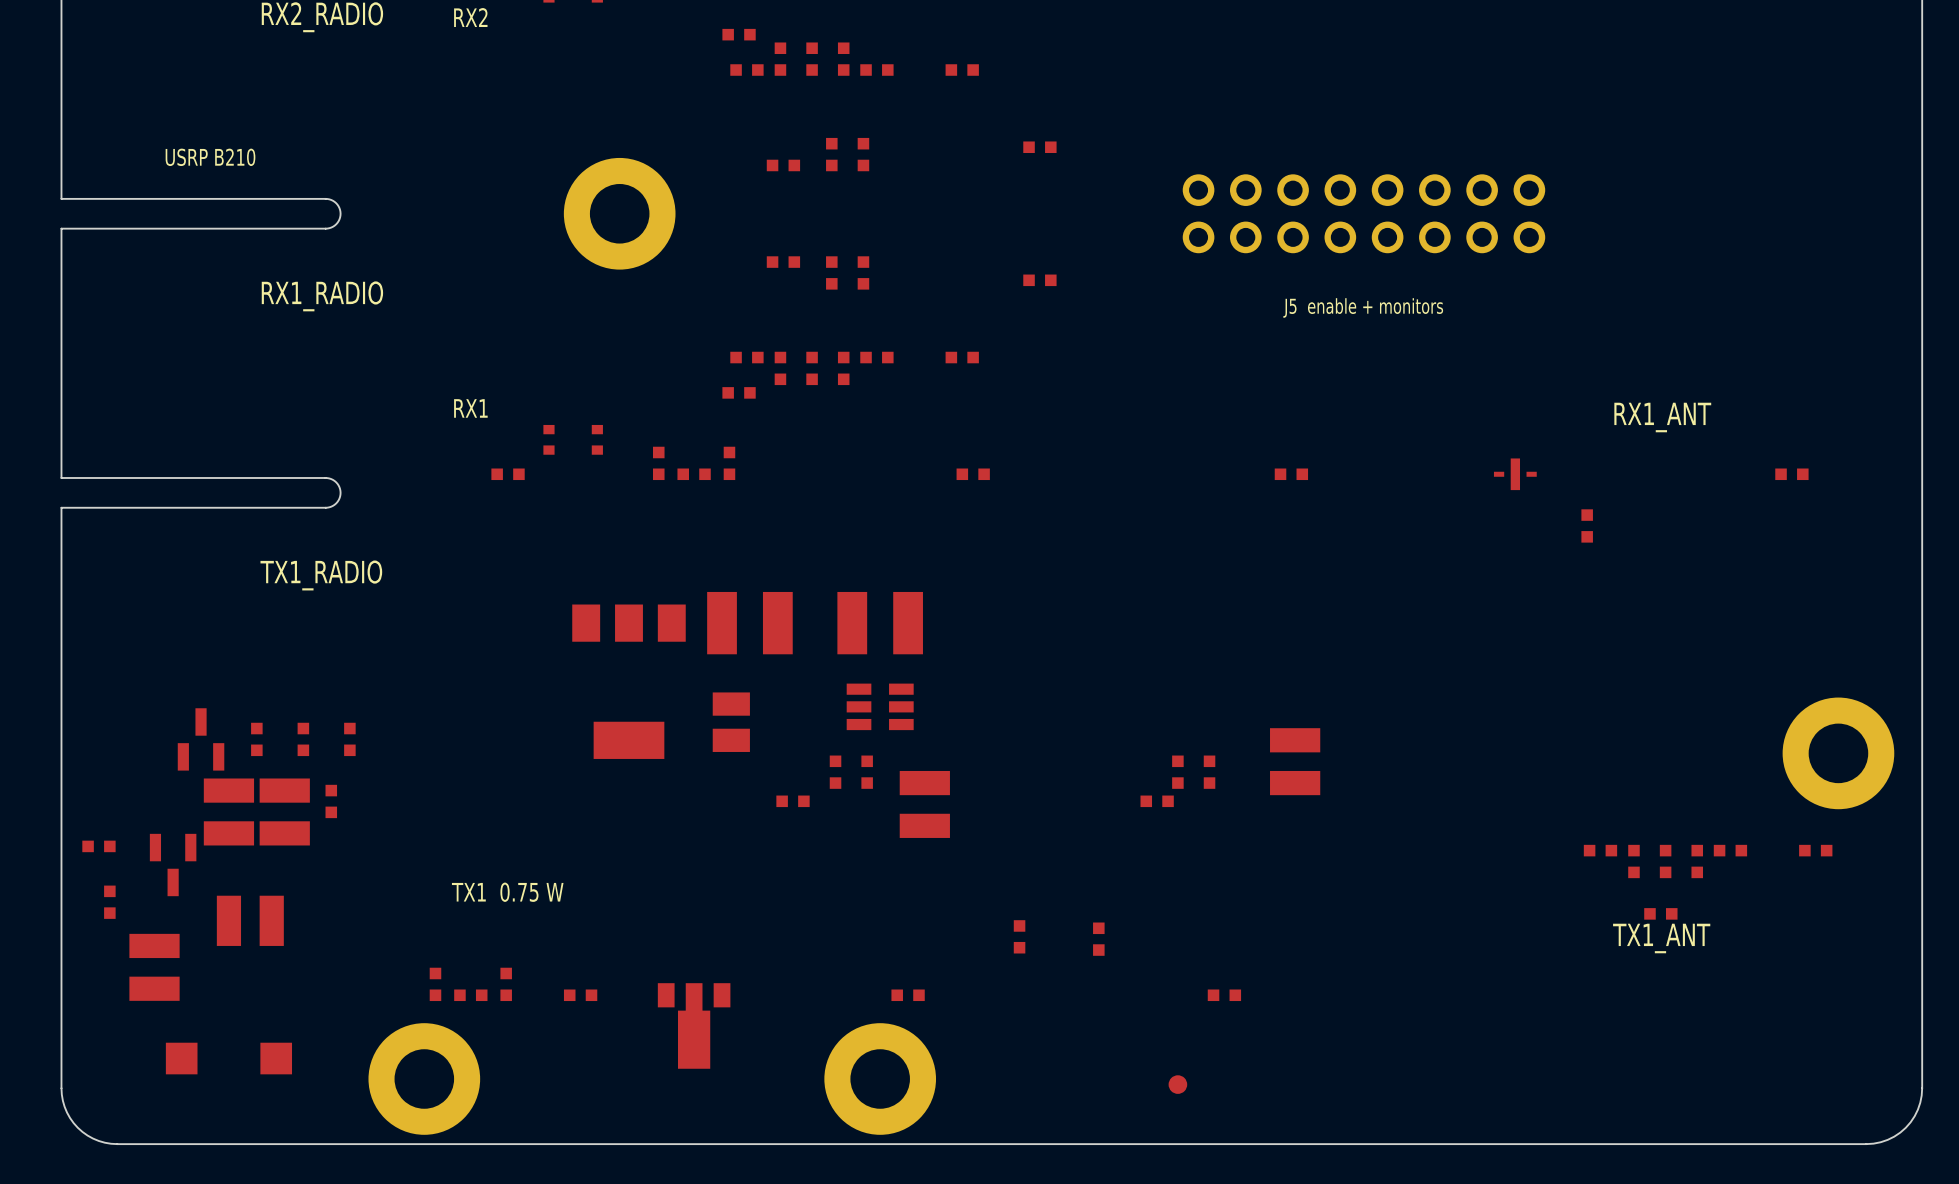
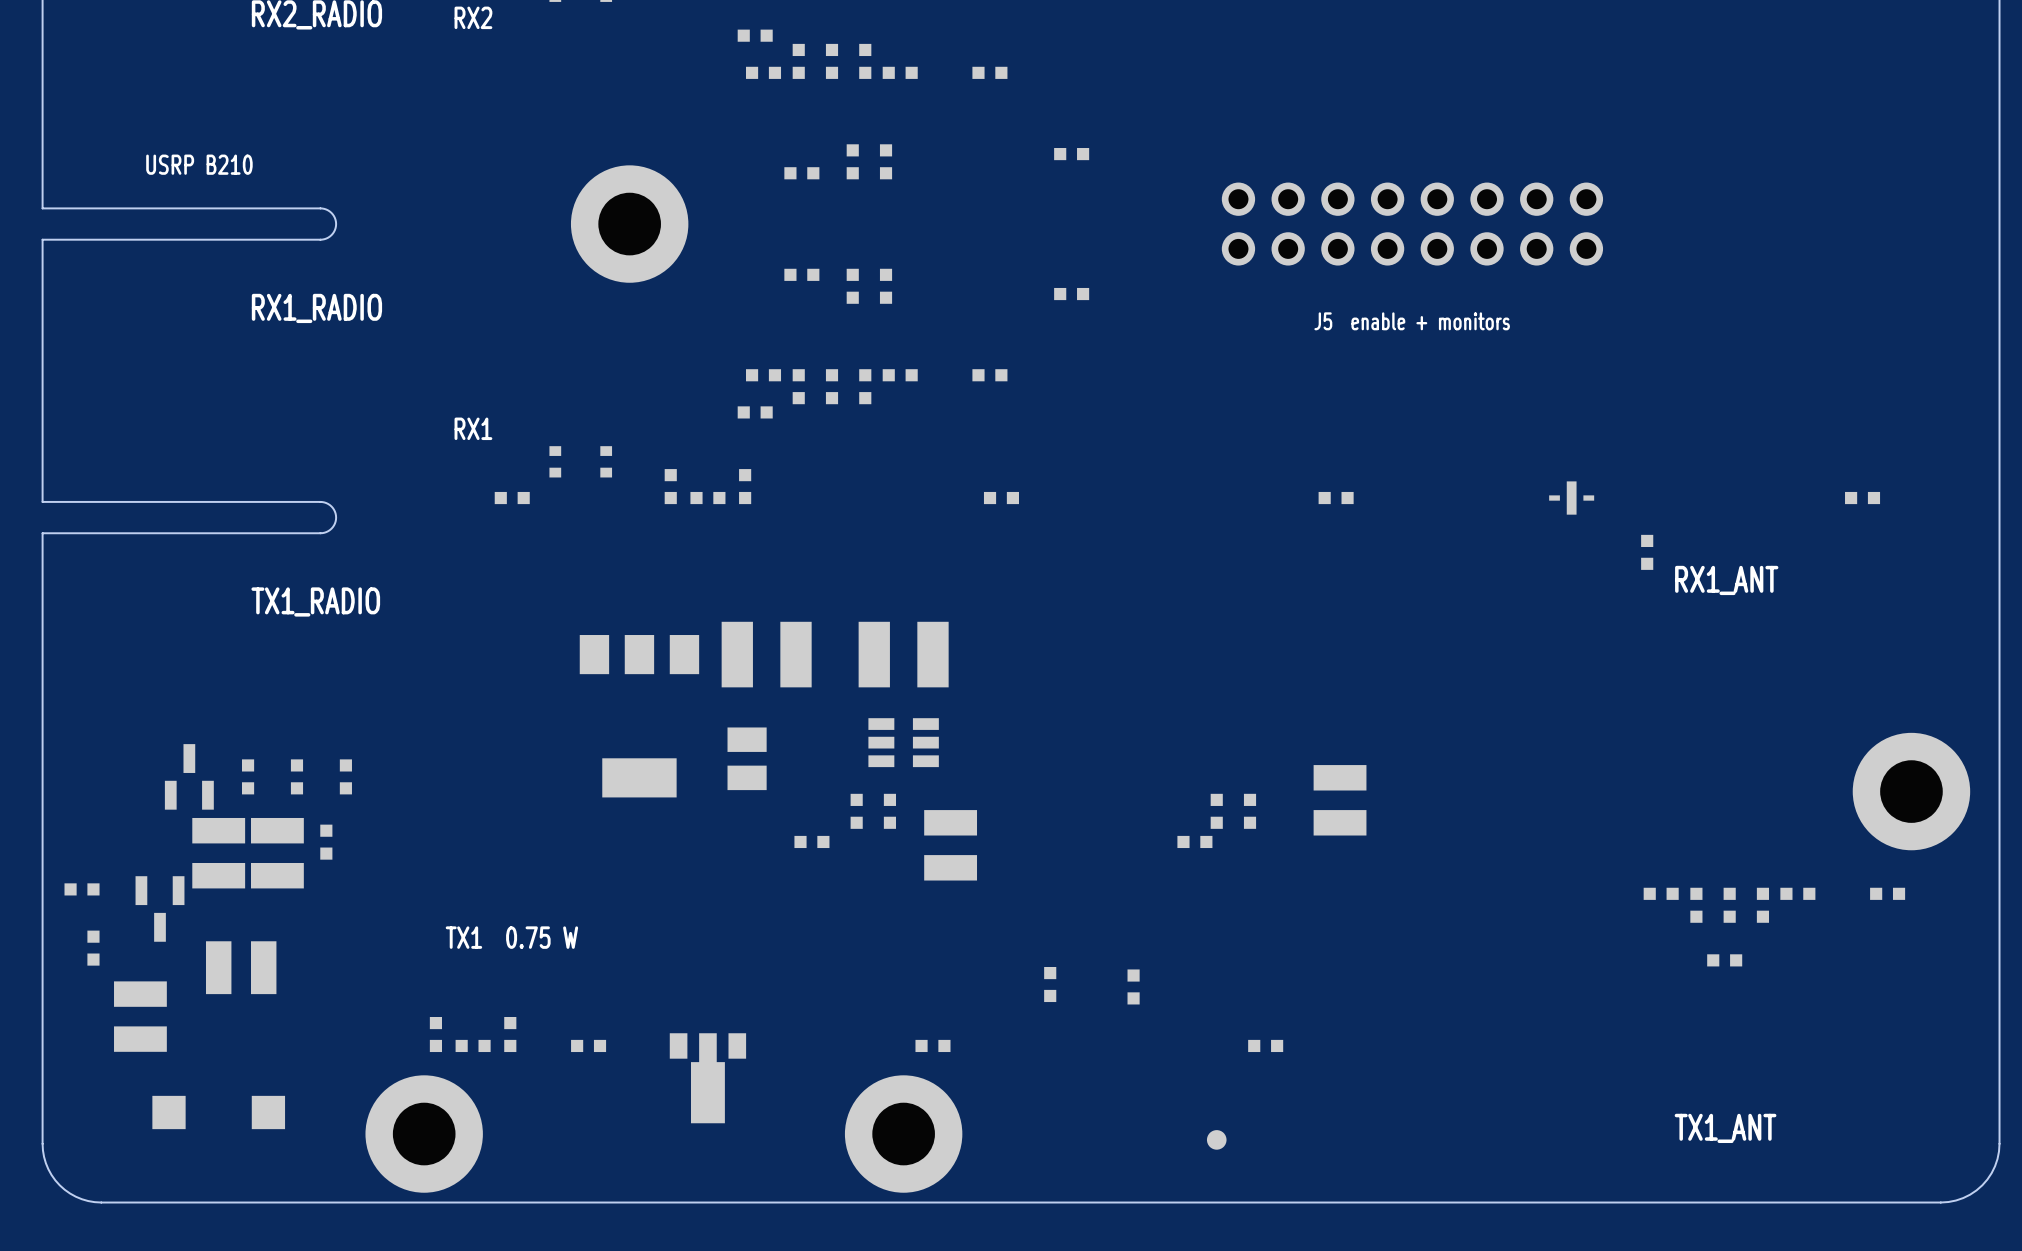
text position: RX1_ANT (1662, 417) -> RX1_ANT (1726, 580)
text position: TX1_ANT (1661, 938) -> TX1_ANT (1725, 1128)

